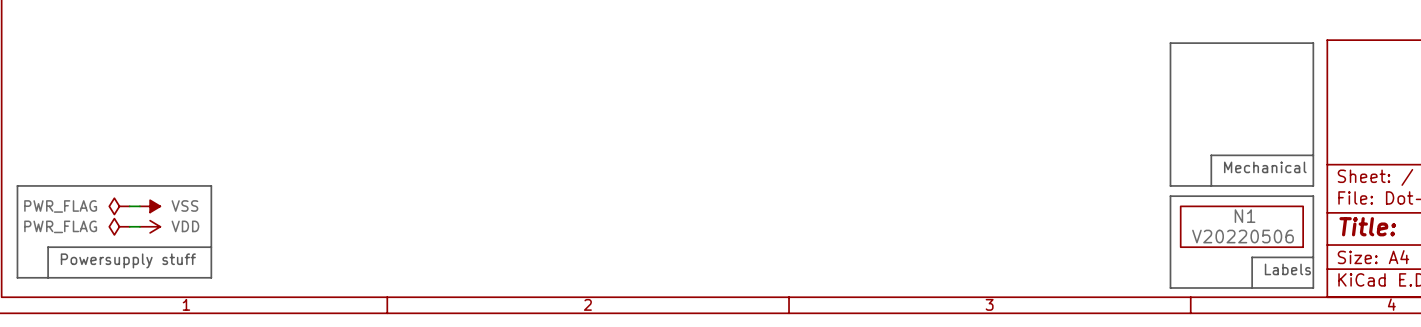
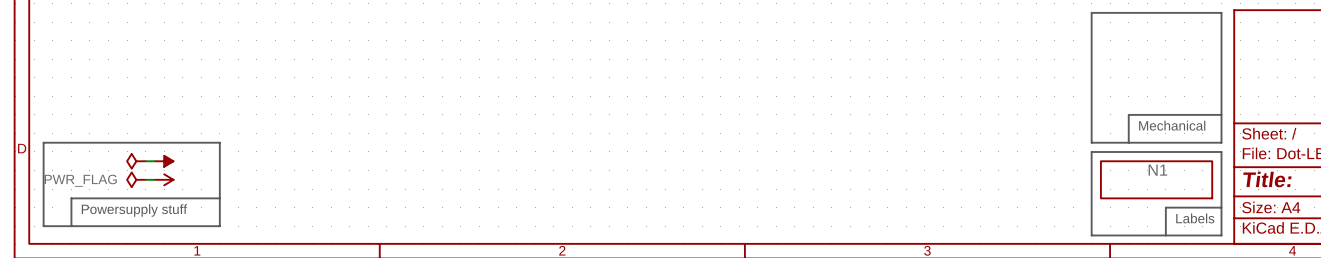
power symbol text: VSS (184, 205) -> none
power symbol text: PWR_FLAG (60, 206) -> none
power symbol text: VDD (185, 226) -> none
N1 value: V20220506 (1243, 236) -> none

